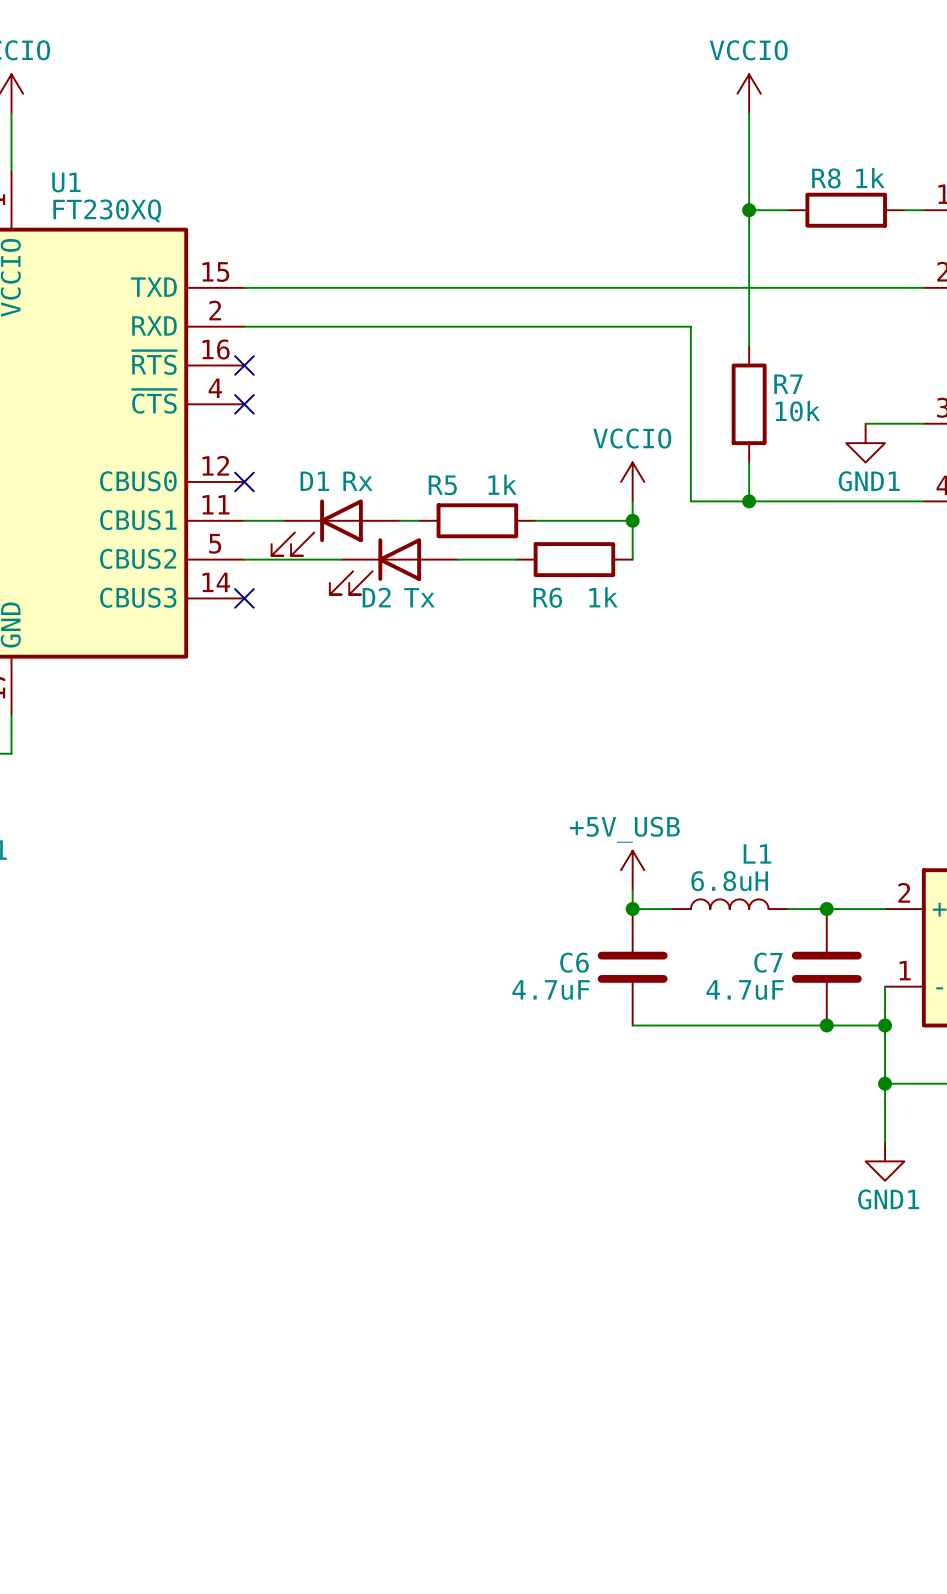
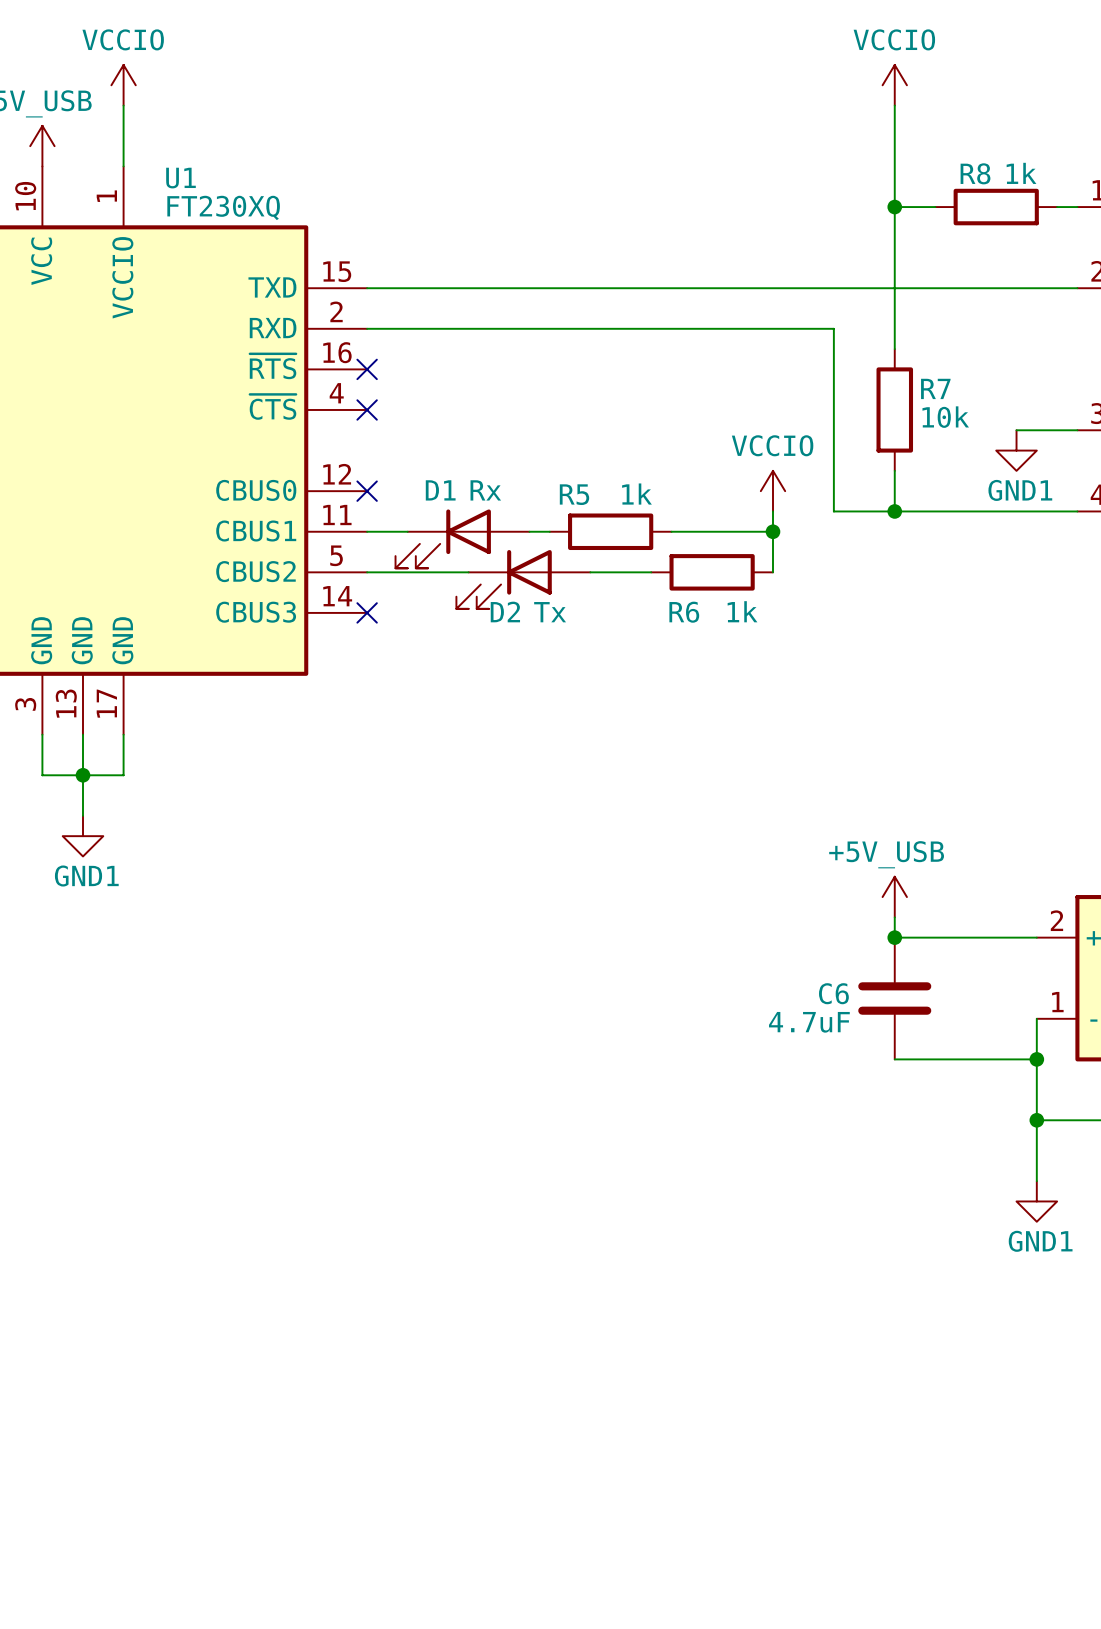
power symbol position: +5V_USB (632, 870) -> +5V_USB (894, 897)
wire: (632, 889) (632, 909) (671, 909) -> (894, 917) (894, 937) (935, 937)
L1: 6.8uH (729, 904) -> none
junction: (632, 909) -> none
junction: none -> (894, 937)
junction: (826, 909) -> none
C6 position: (632, 967) -> (894, 998)
C7: 4.7uF (826, 967) -> none
wire: (632, 1025) (749, 1025) -> none
junction: (826, 1025) -> none

